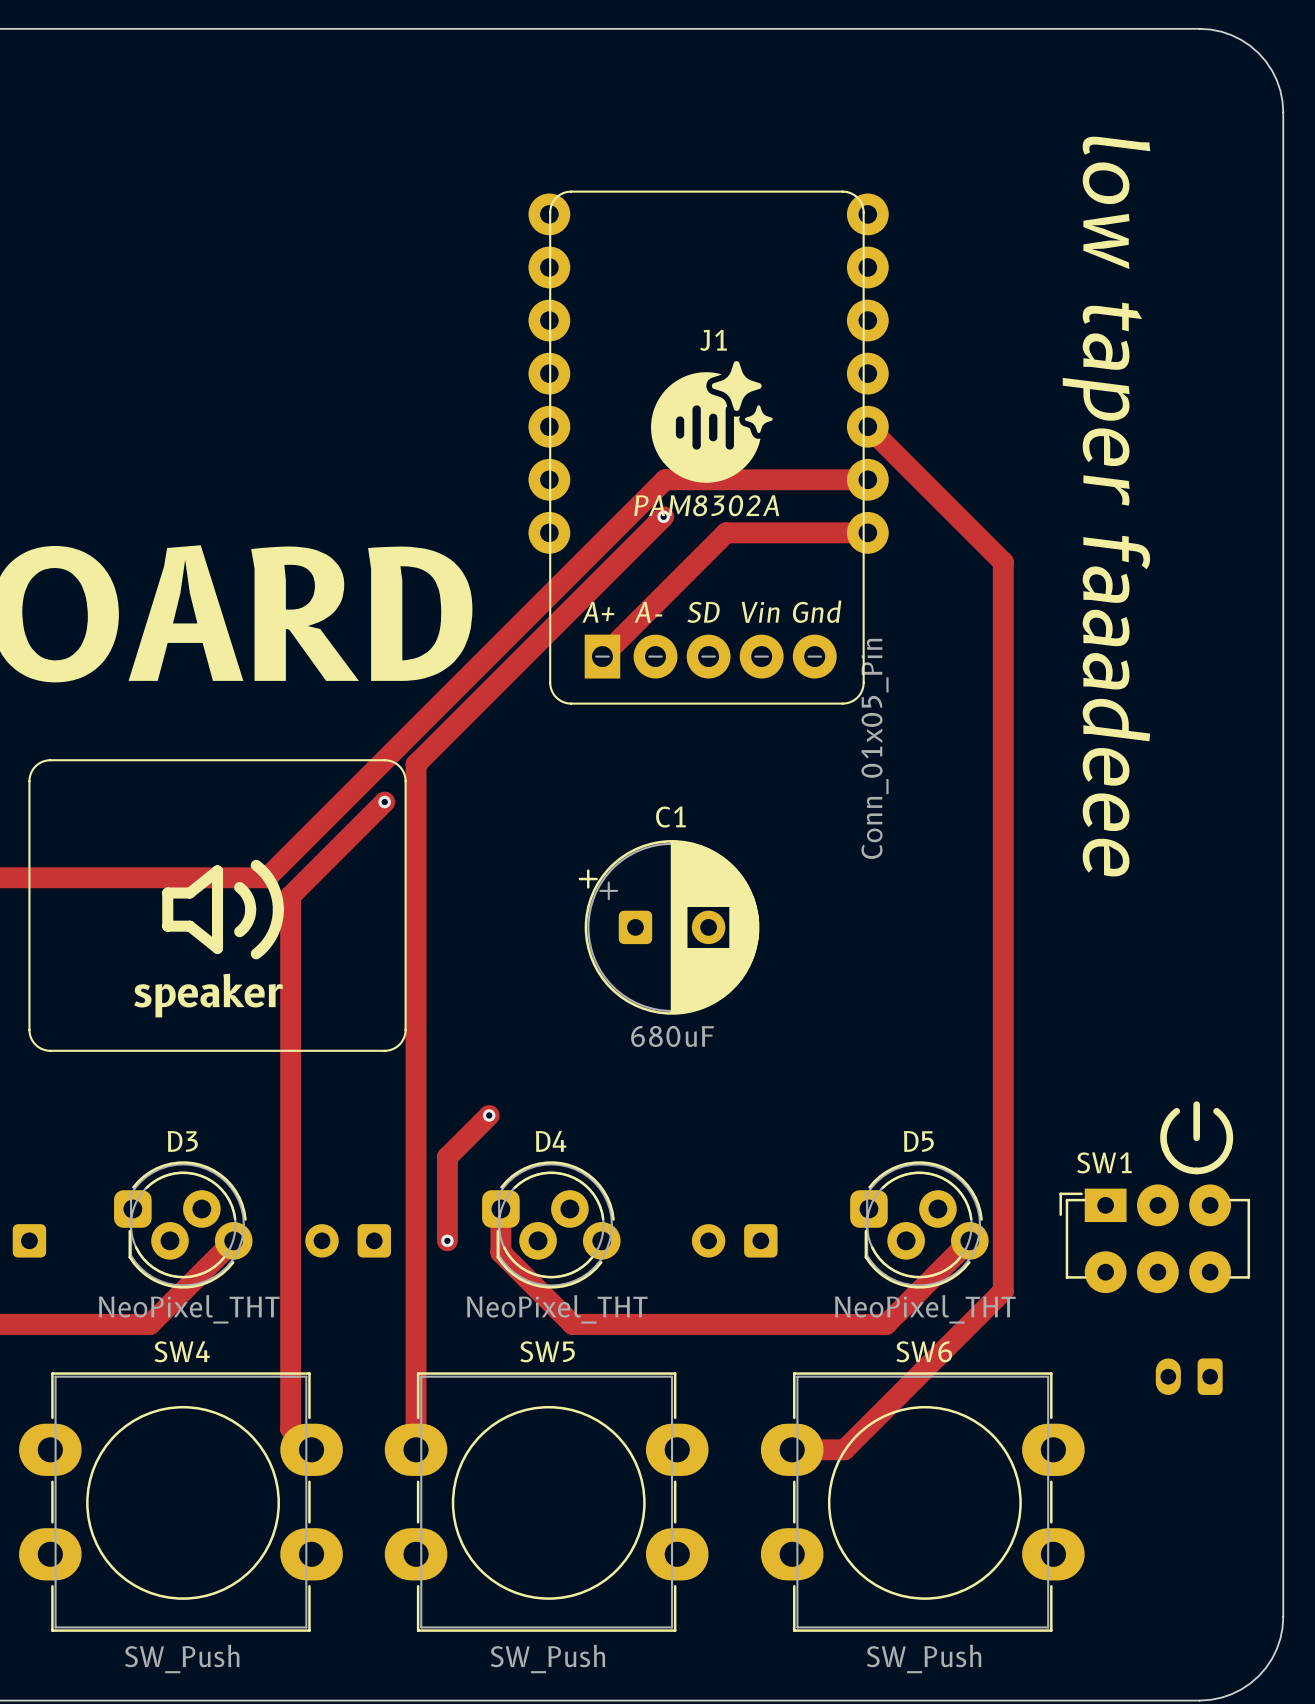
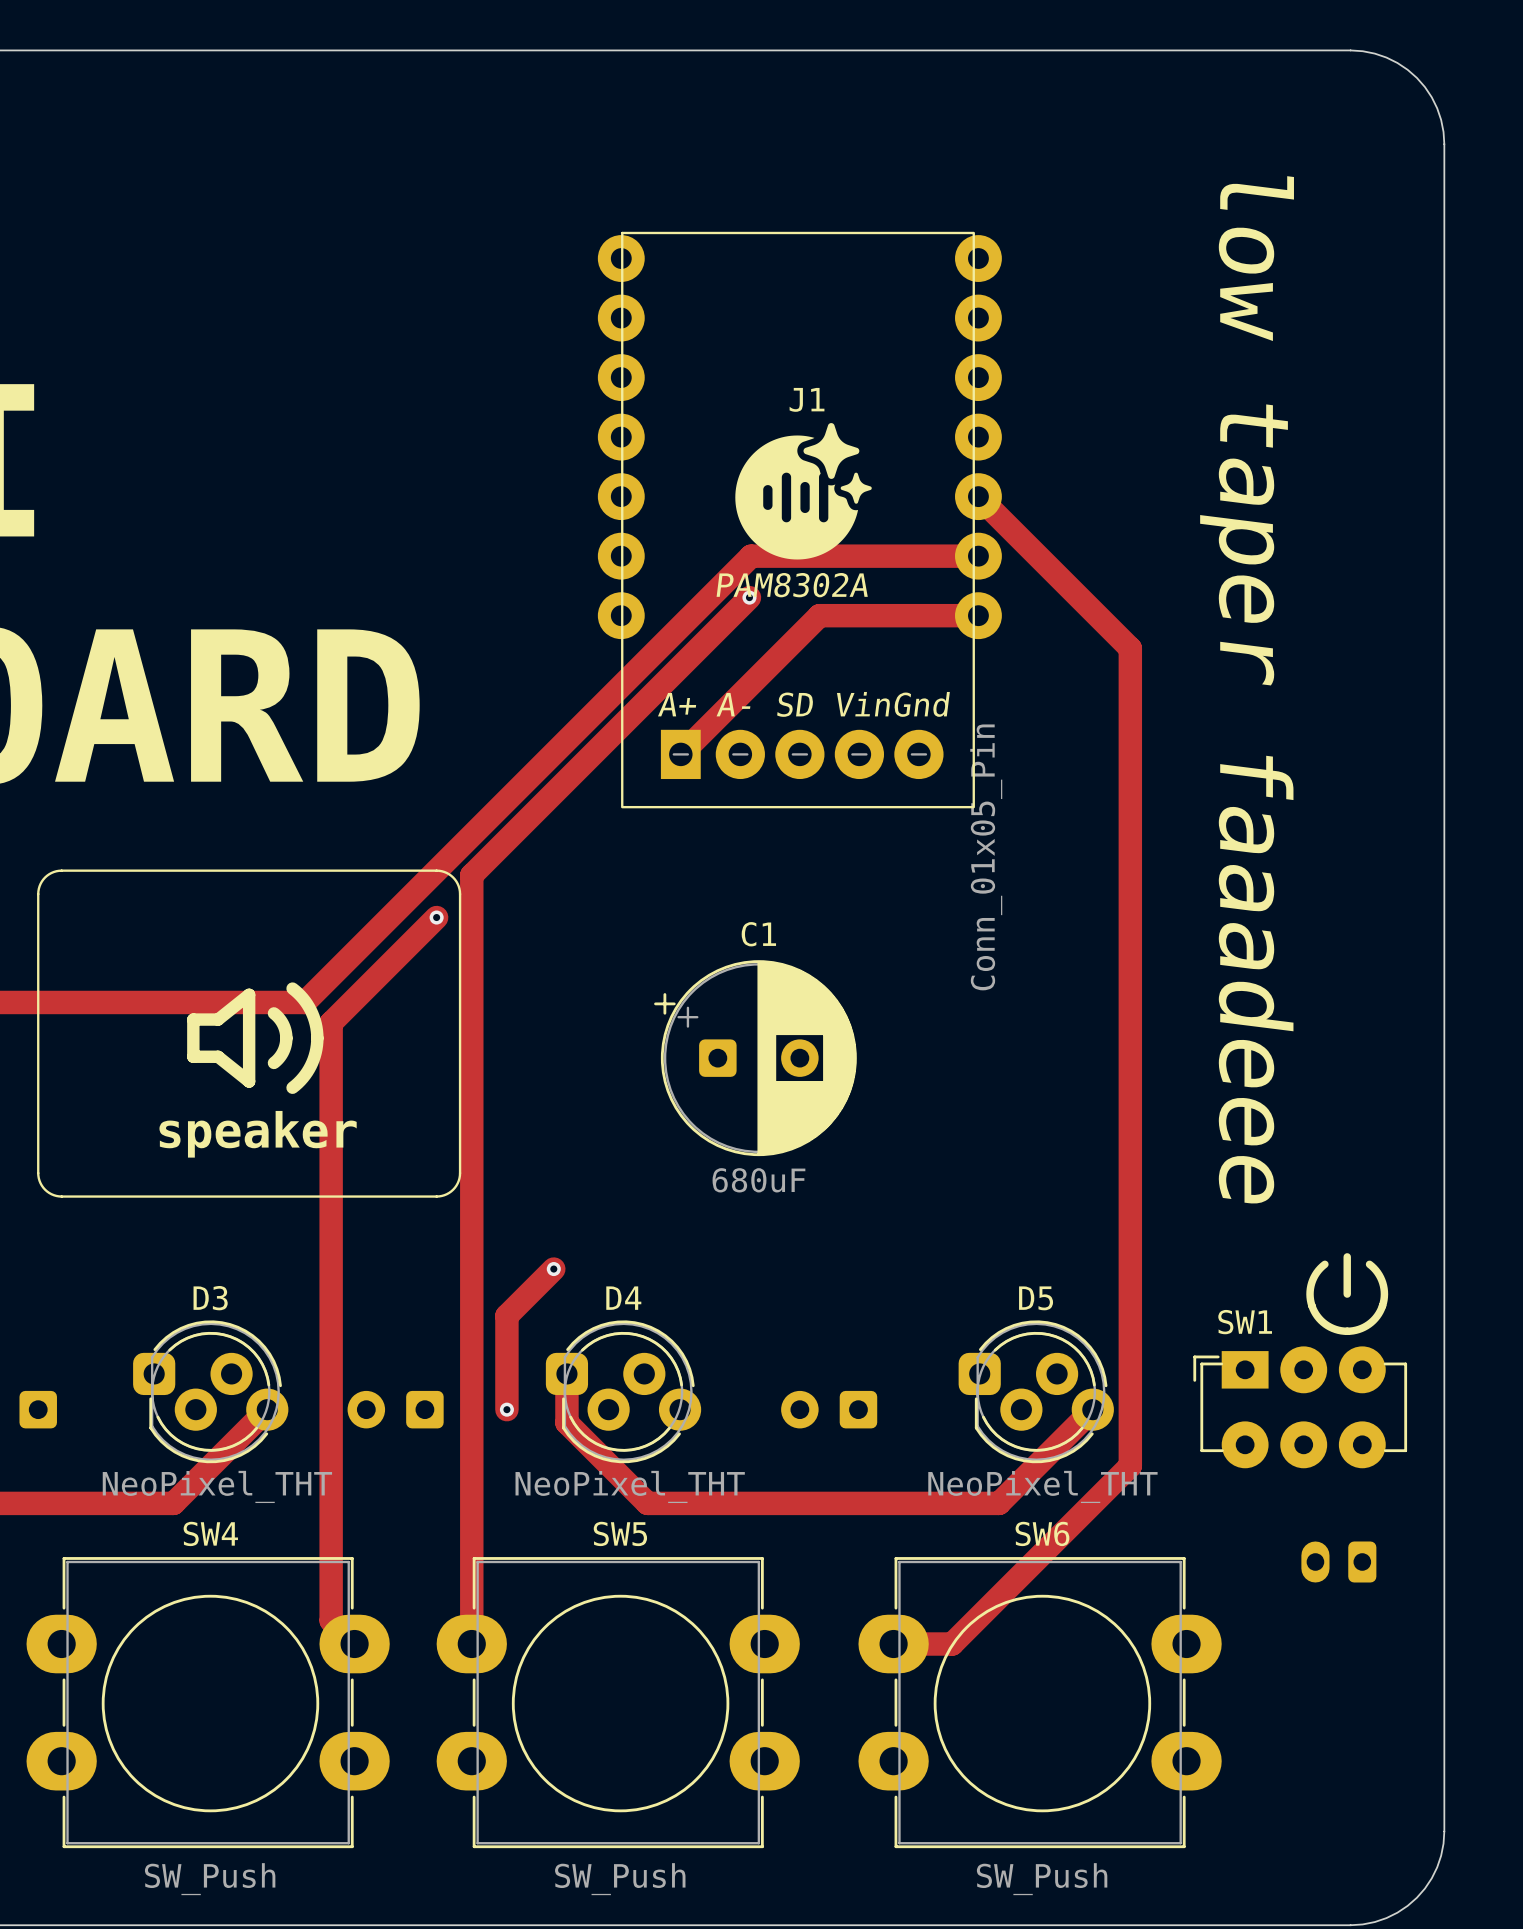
J1 footprint: [549, 190, 865, 705] -> [621, 231, 975, 809]

